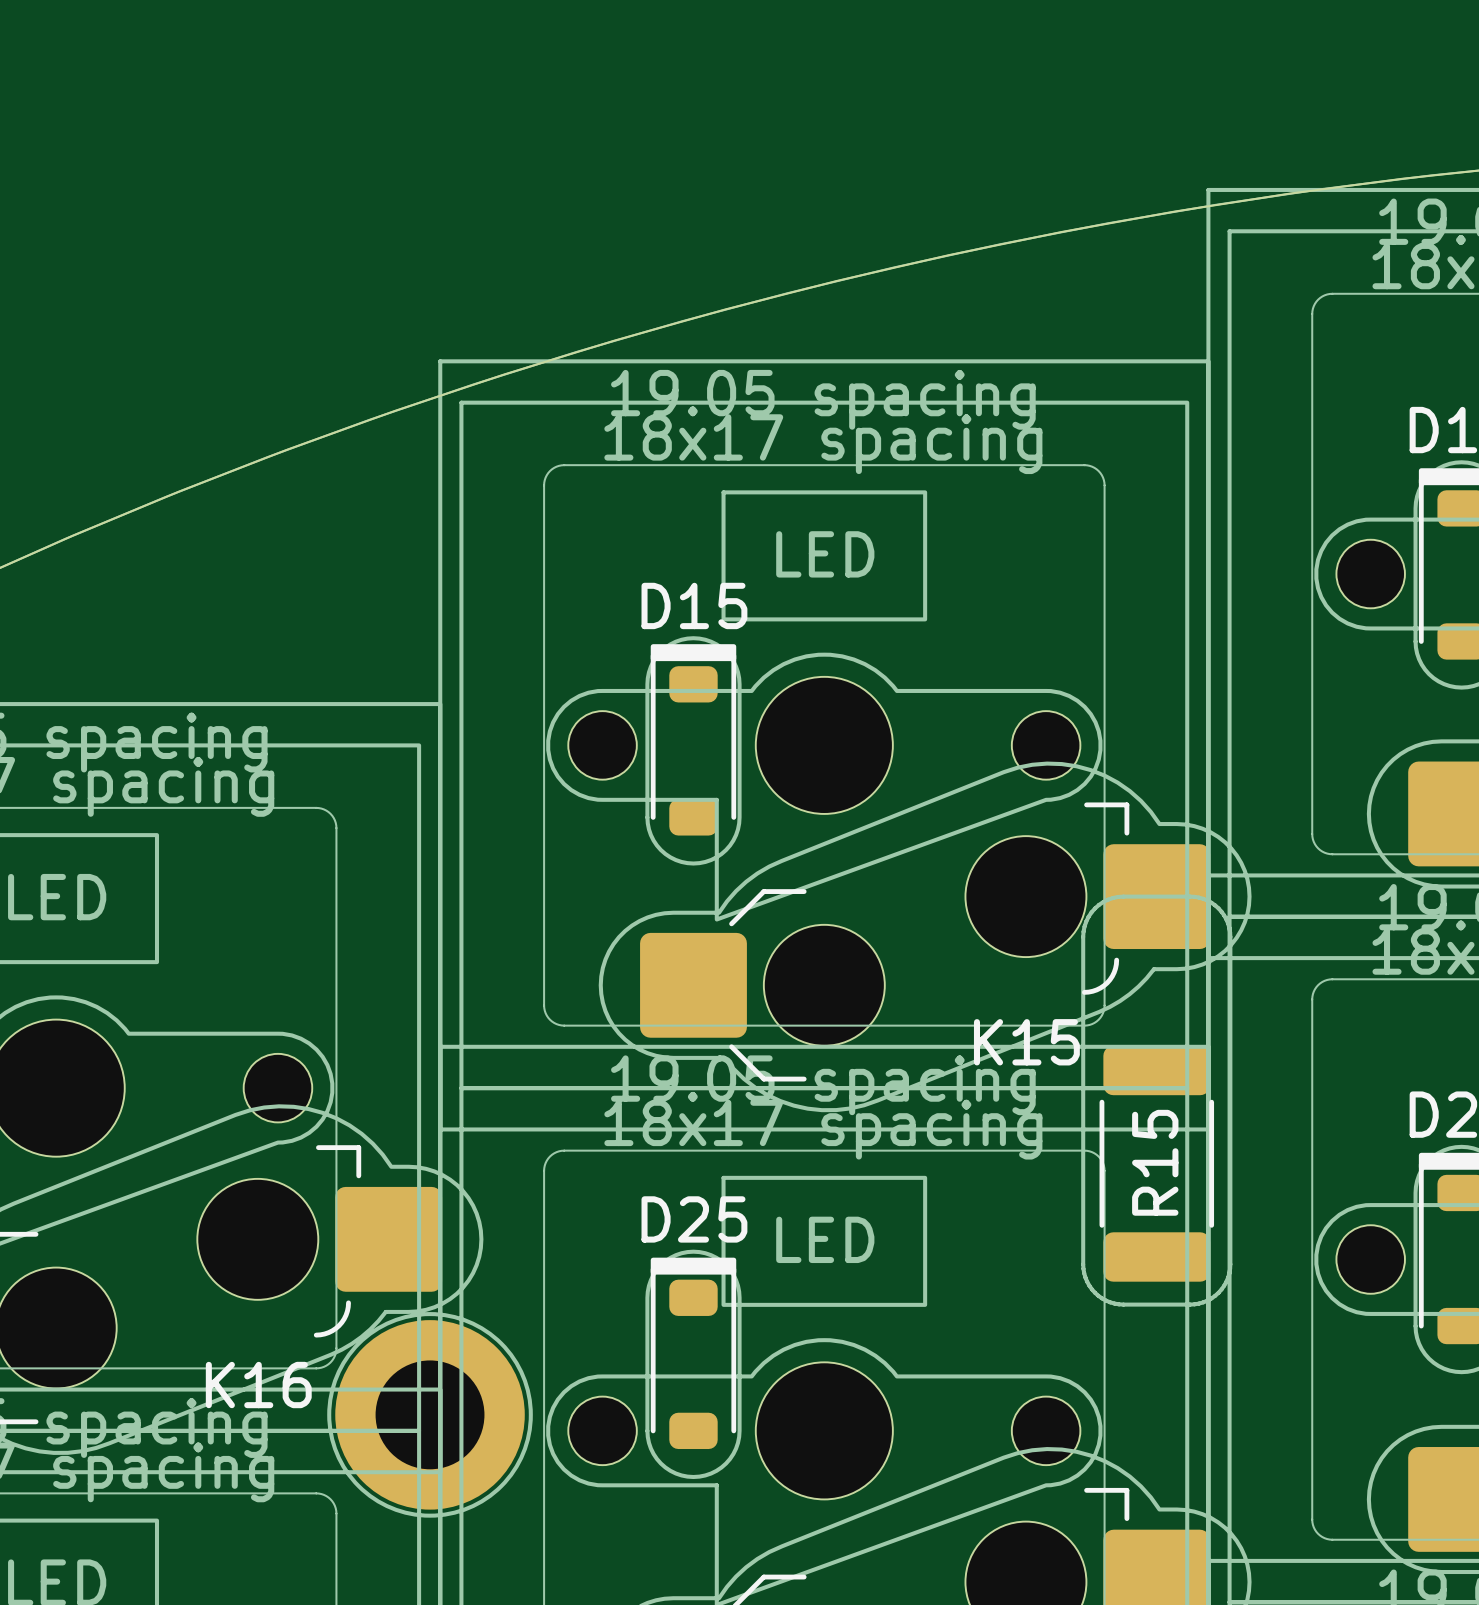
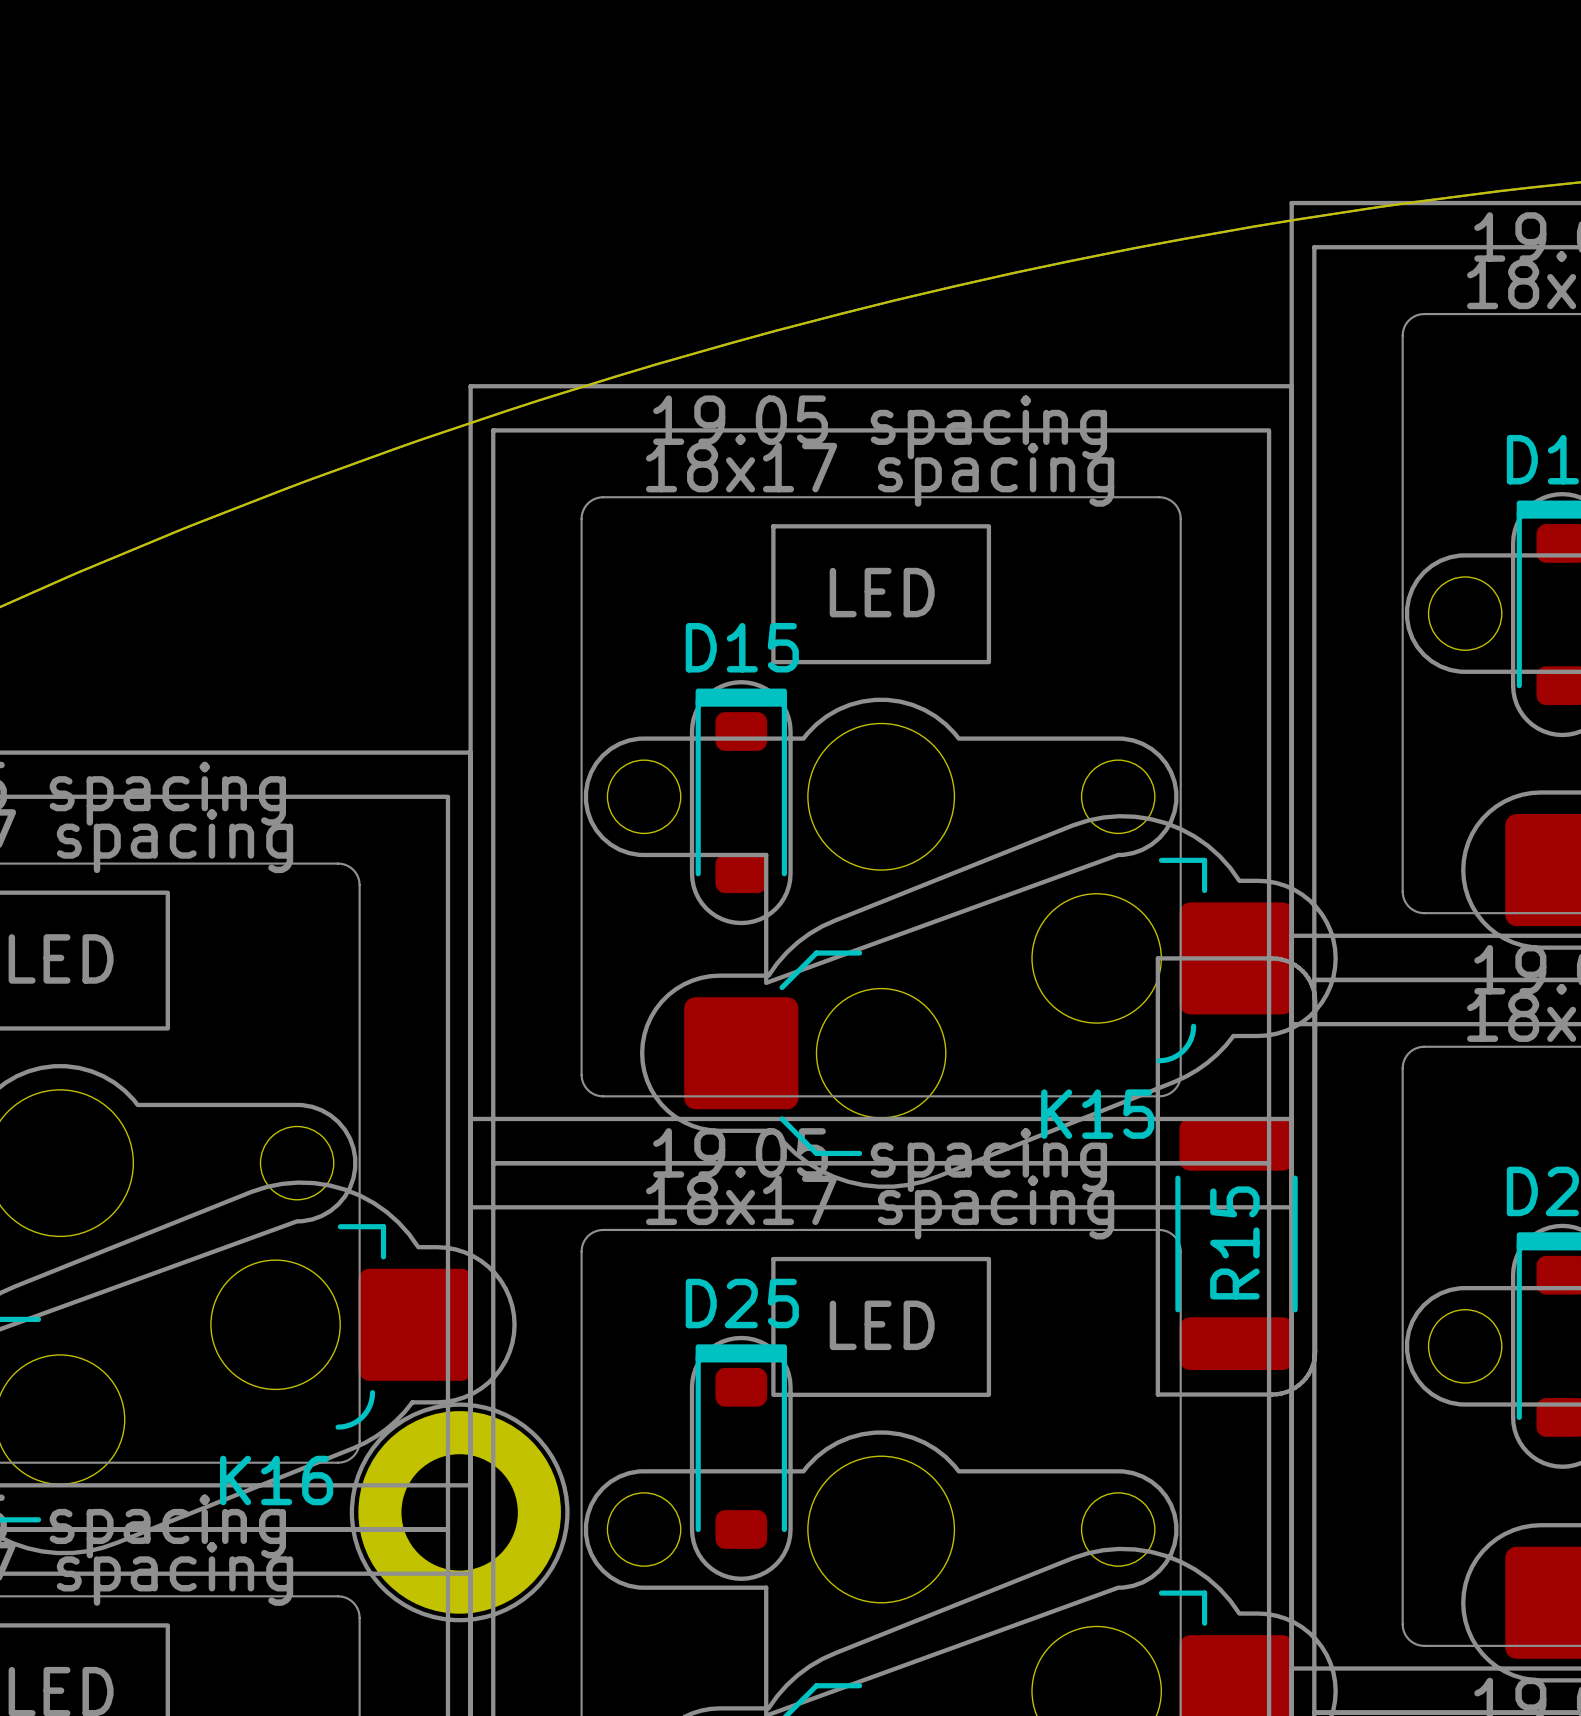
line: (1123, 896) (1108, 899) (1095, 908) (1086, 921) (1083, 936) -> (1200, 958) (1157, 958) (1157, 1001)
line: (1083, 1264) (1085, 1277) (1095, 1292) (1110, 1302) (1123, 1304) -> (1157, 1351) (1157, 1394) (1200, 1394)

